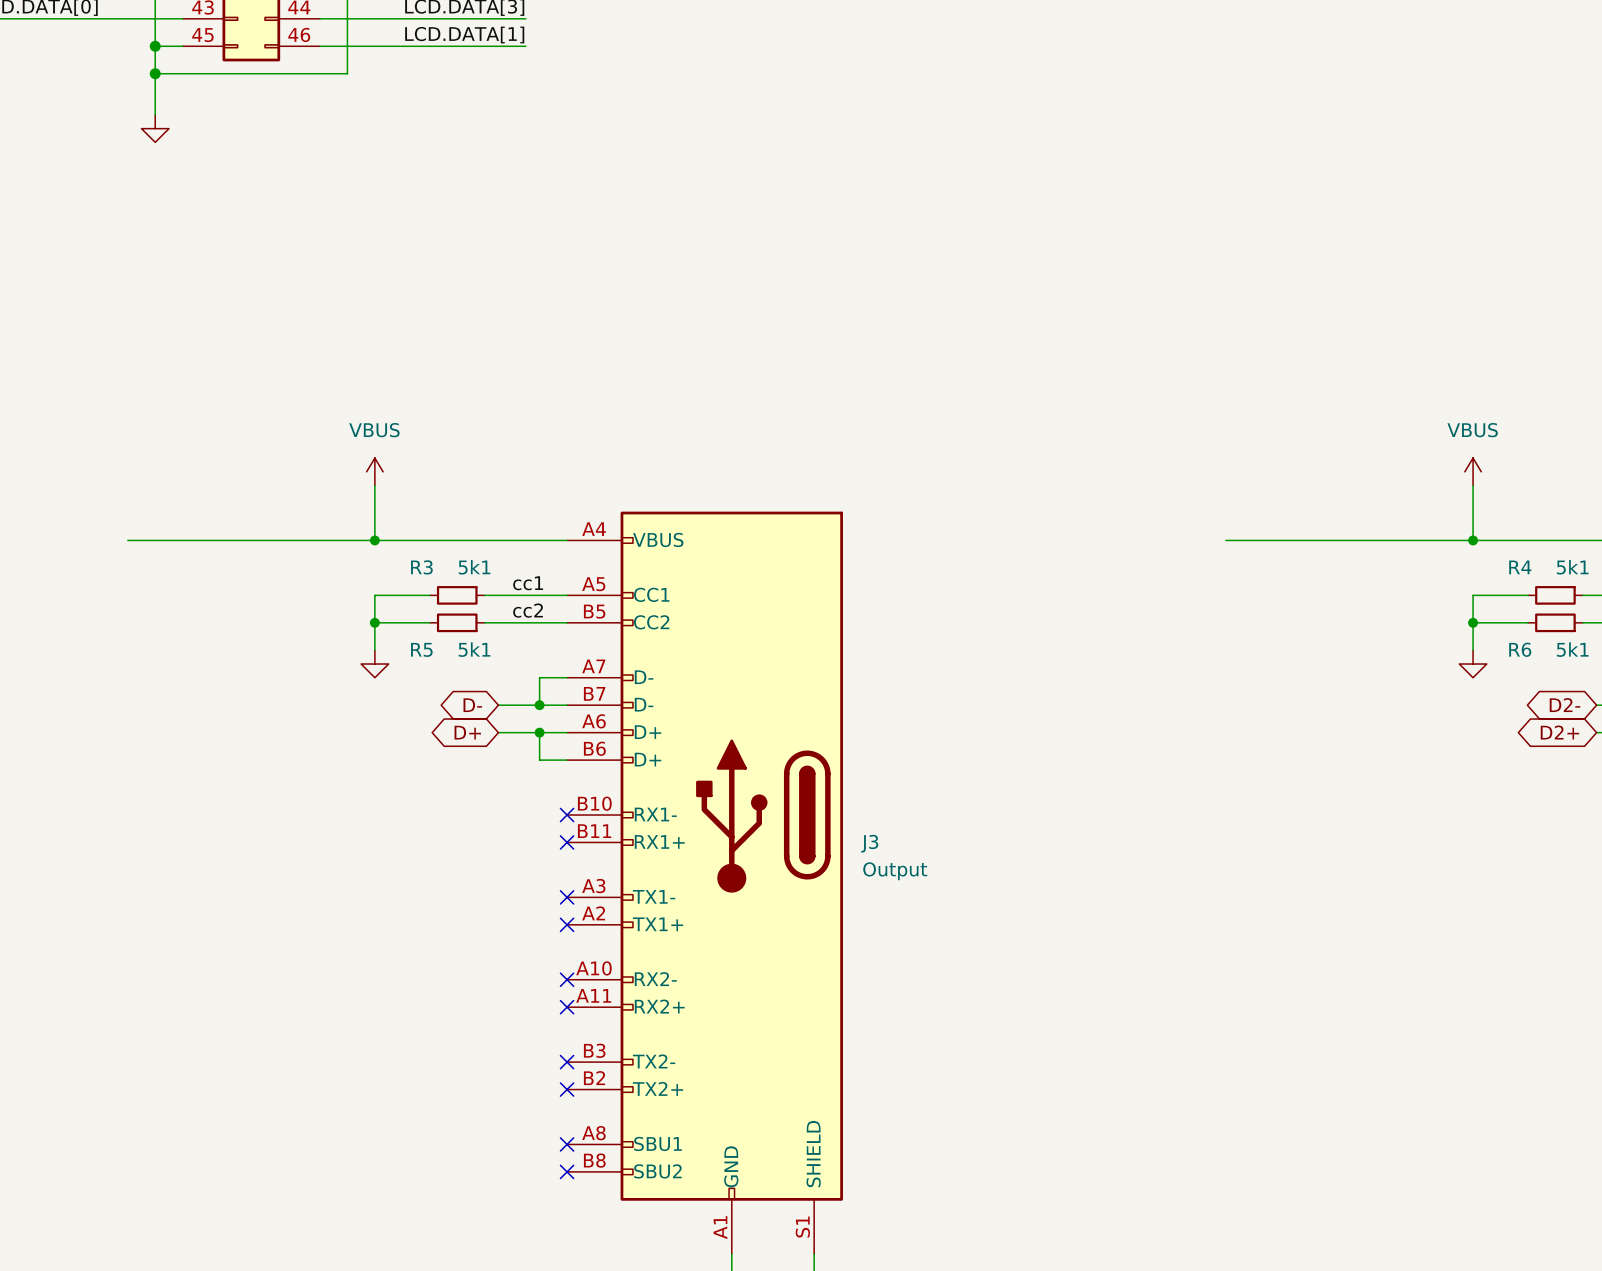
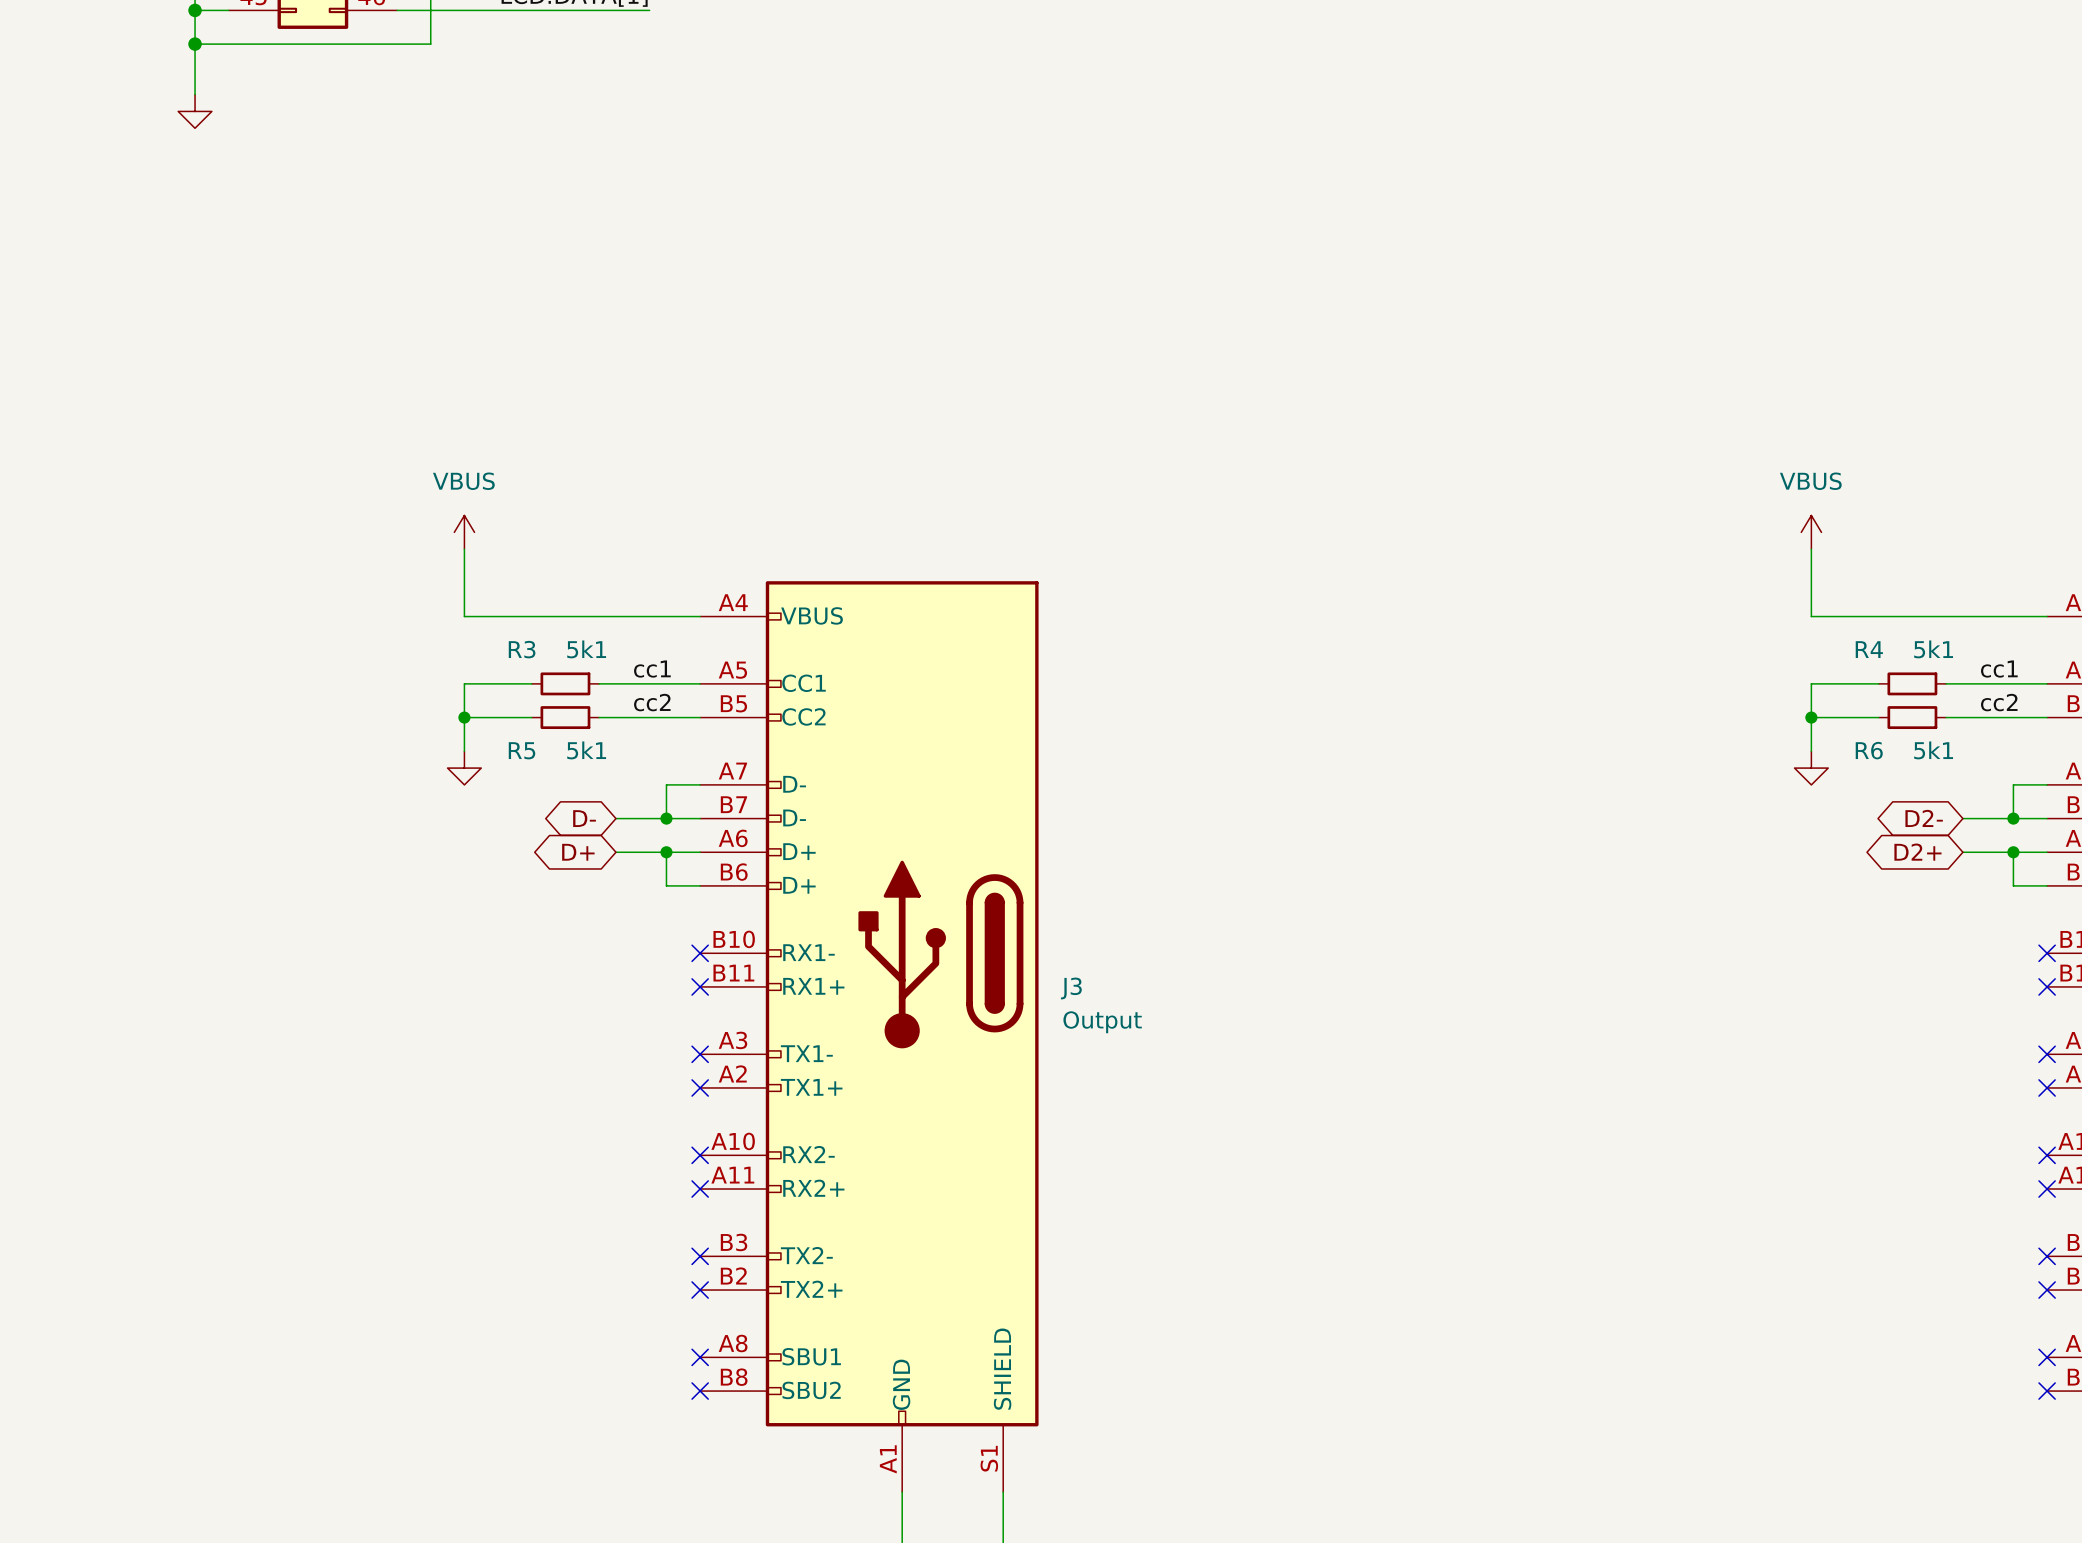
wire: (127, 540) (374, 540) -> none
junction: (374, 540) -> none
wire: (1225, 540) (1473, 540) -> none
junction: (1473, 540) -> none

